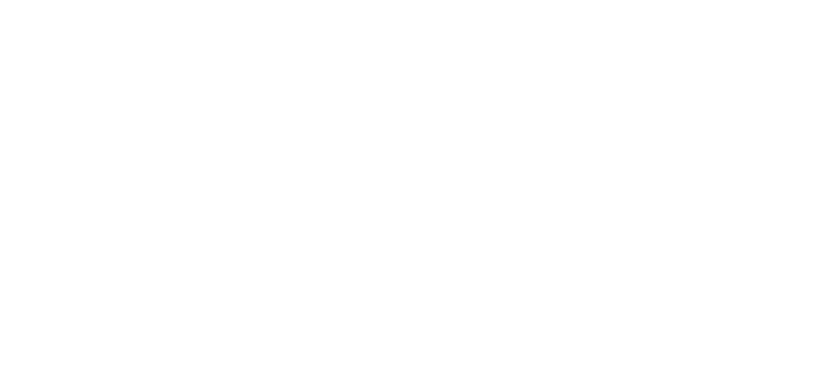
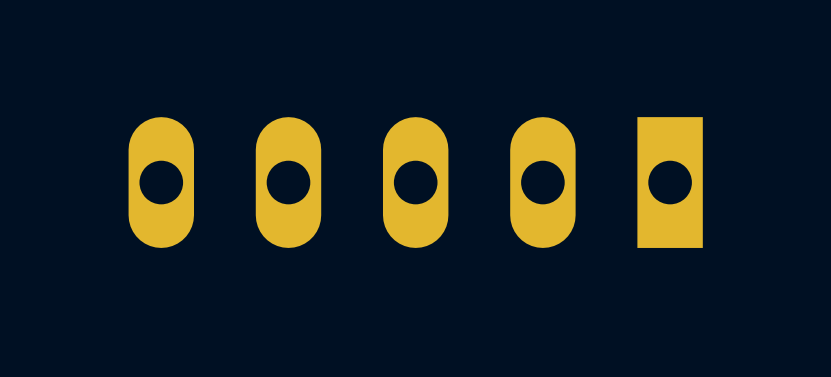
part: none -> (415, 182)

